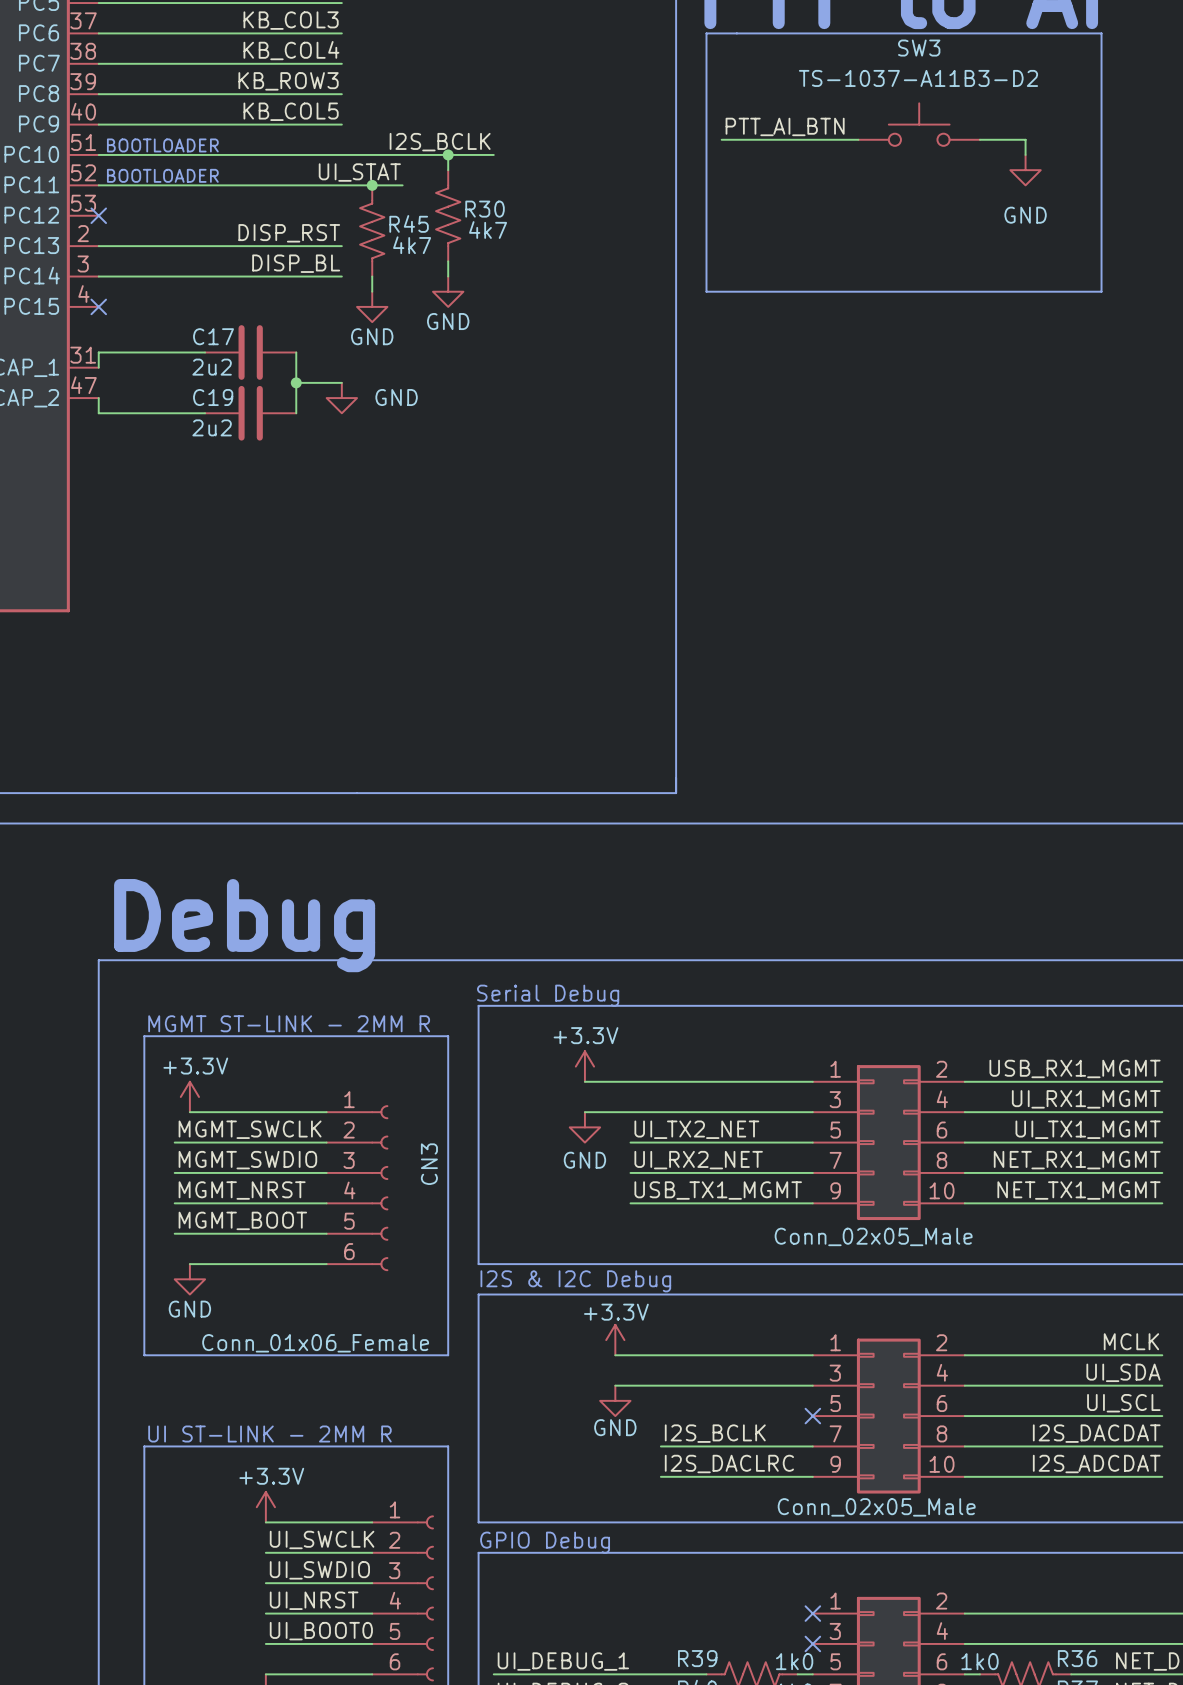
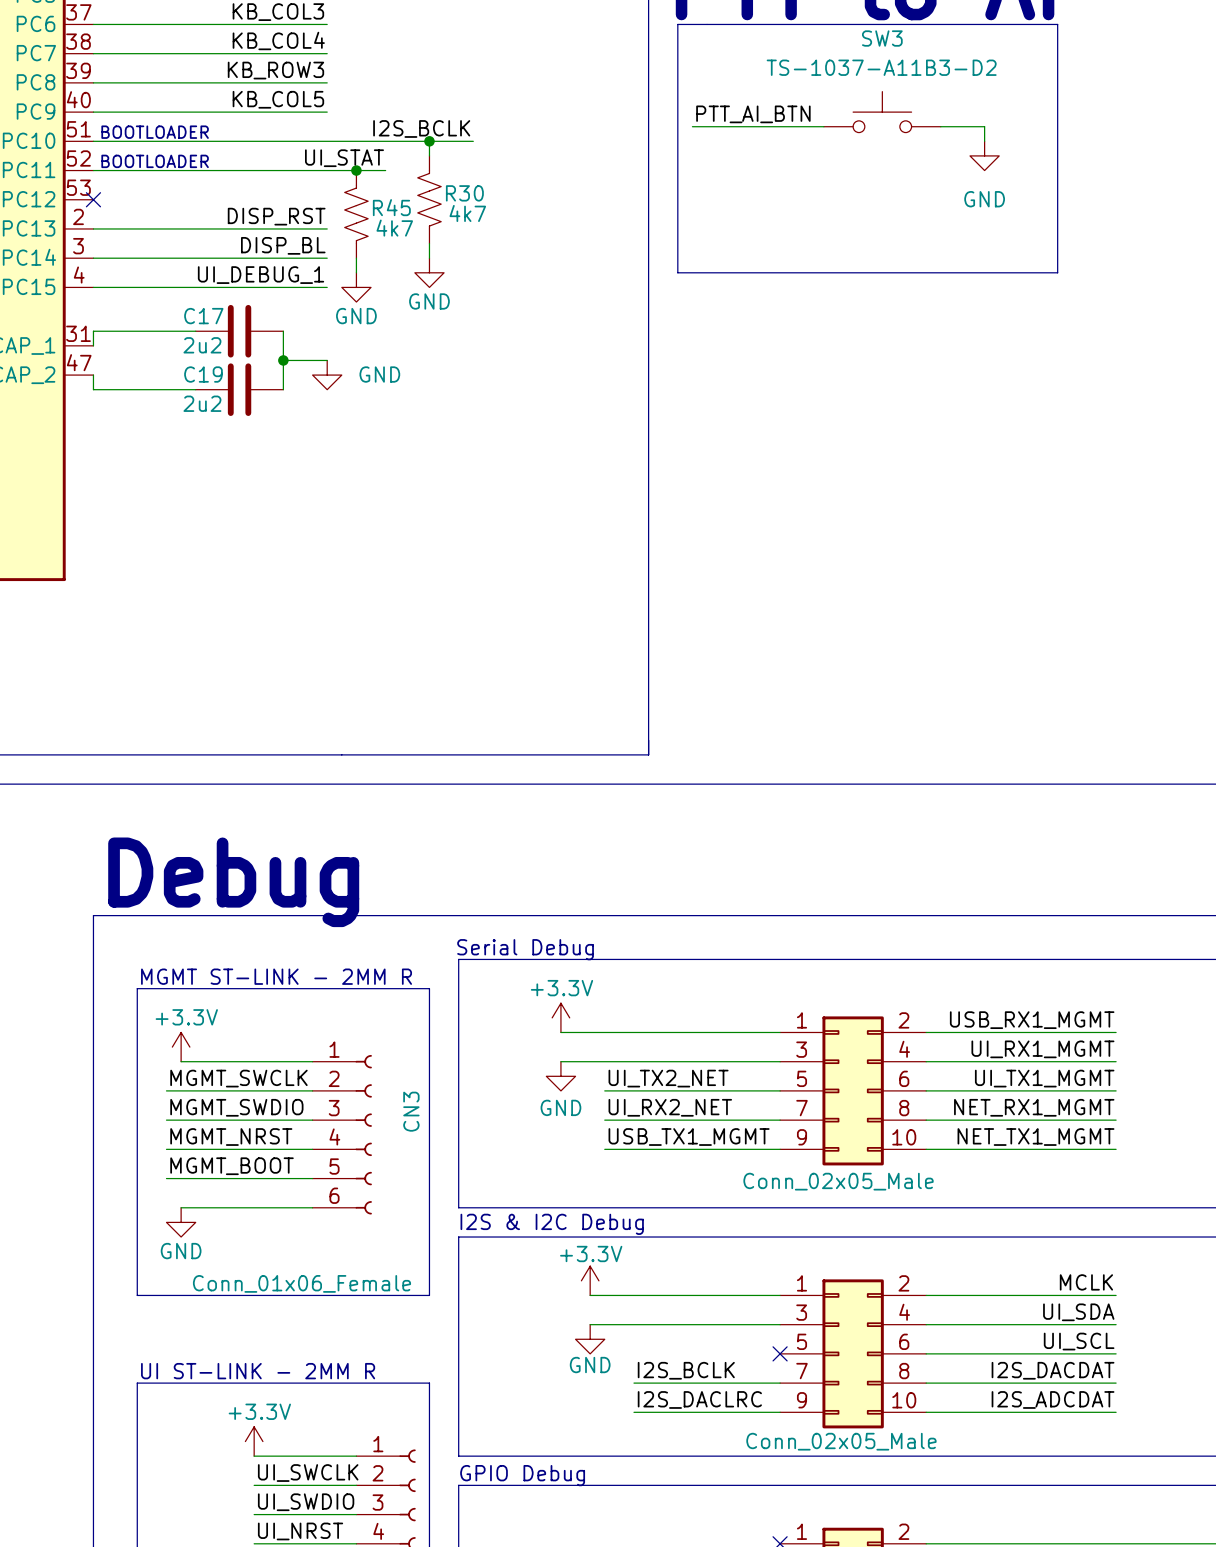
label: none -> UI_DEBUG_1 (261, 275)
wire: none -> (93, 287) (327, 287)
no-connect mark: (98, 306) -> none

